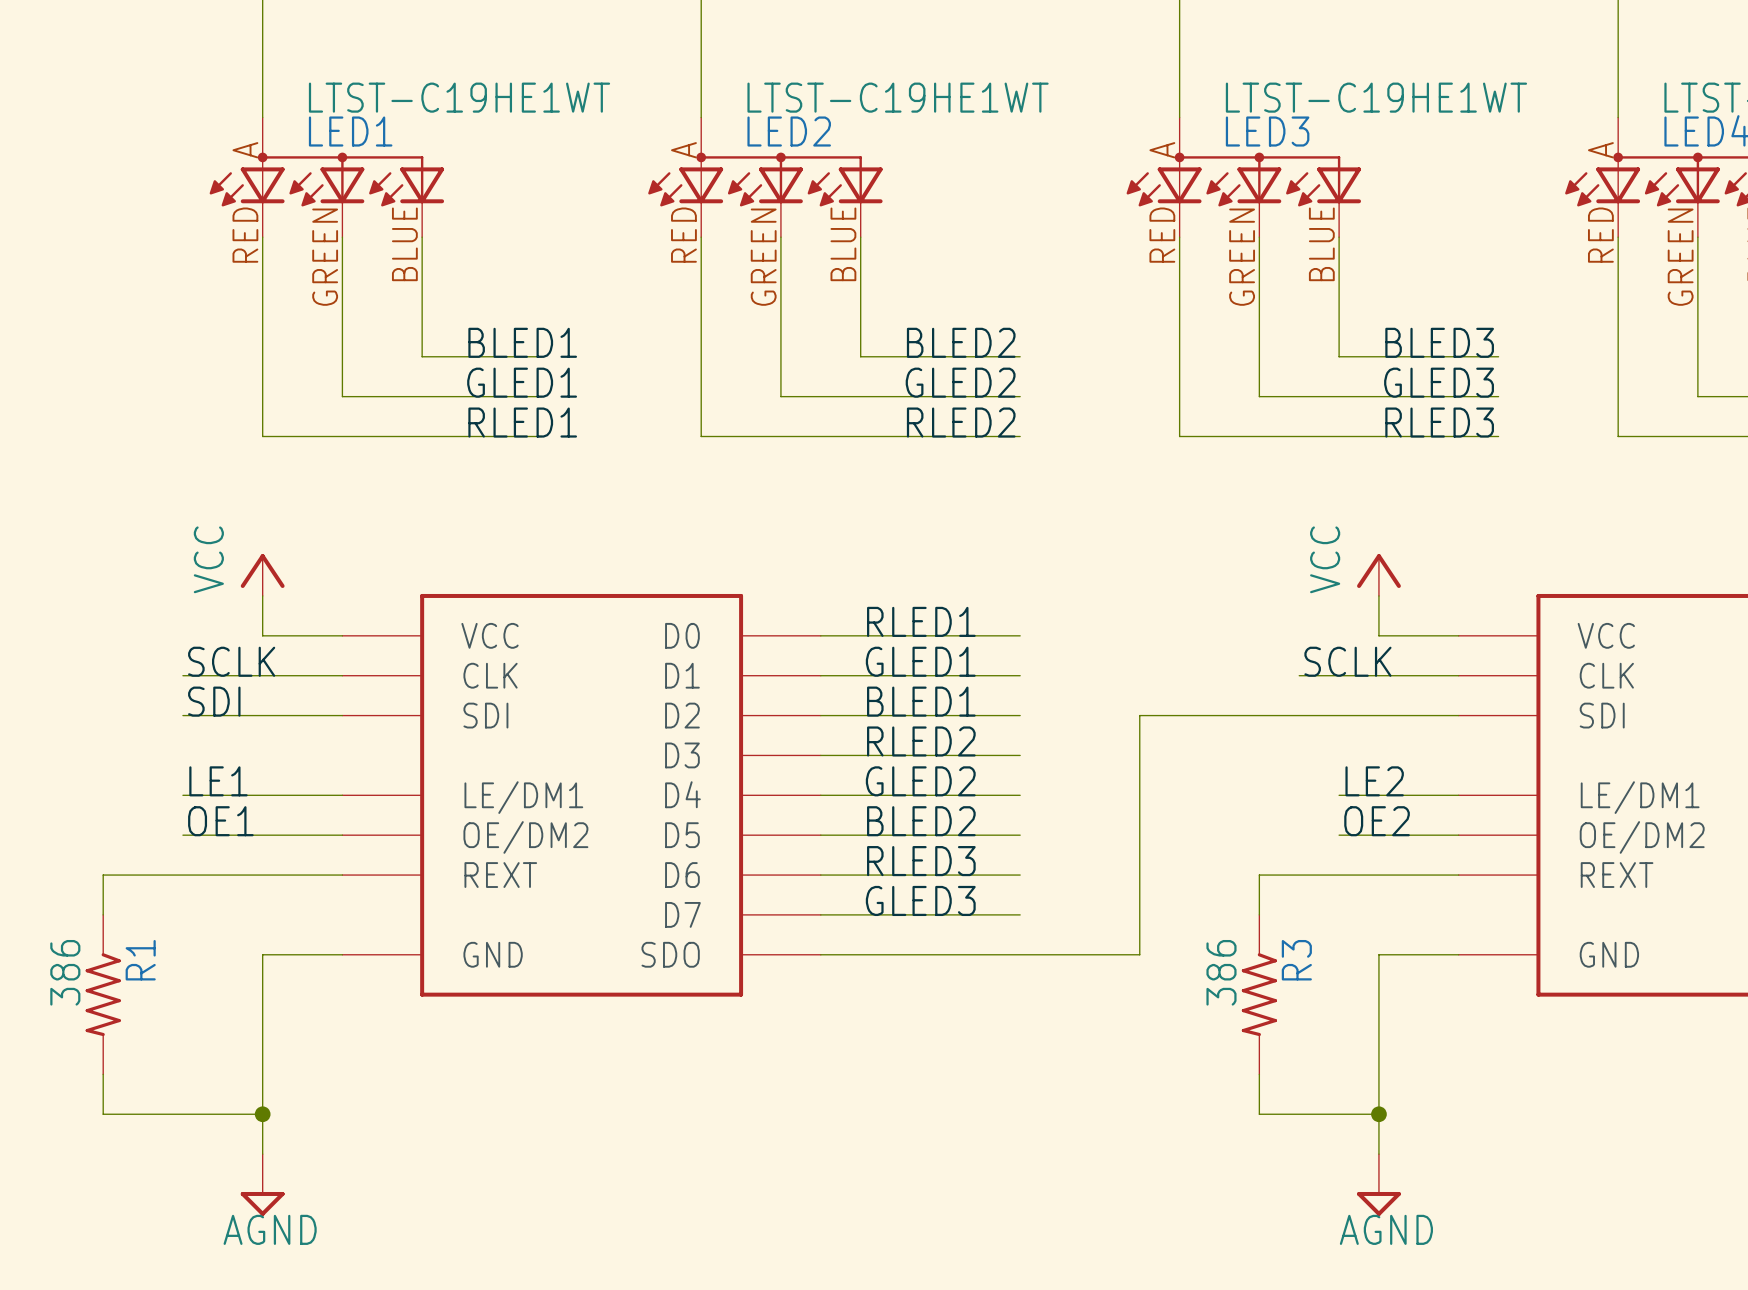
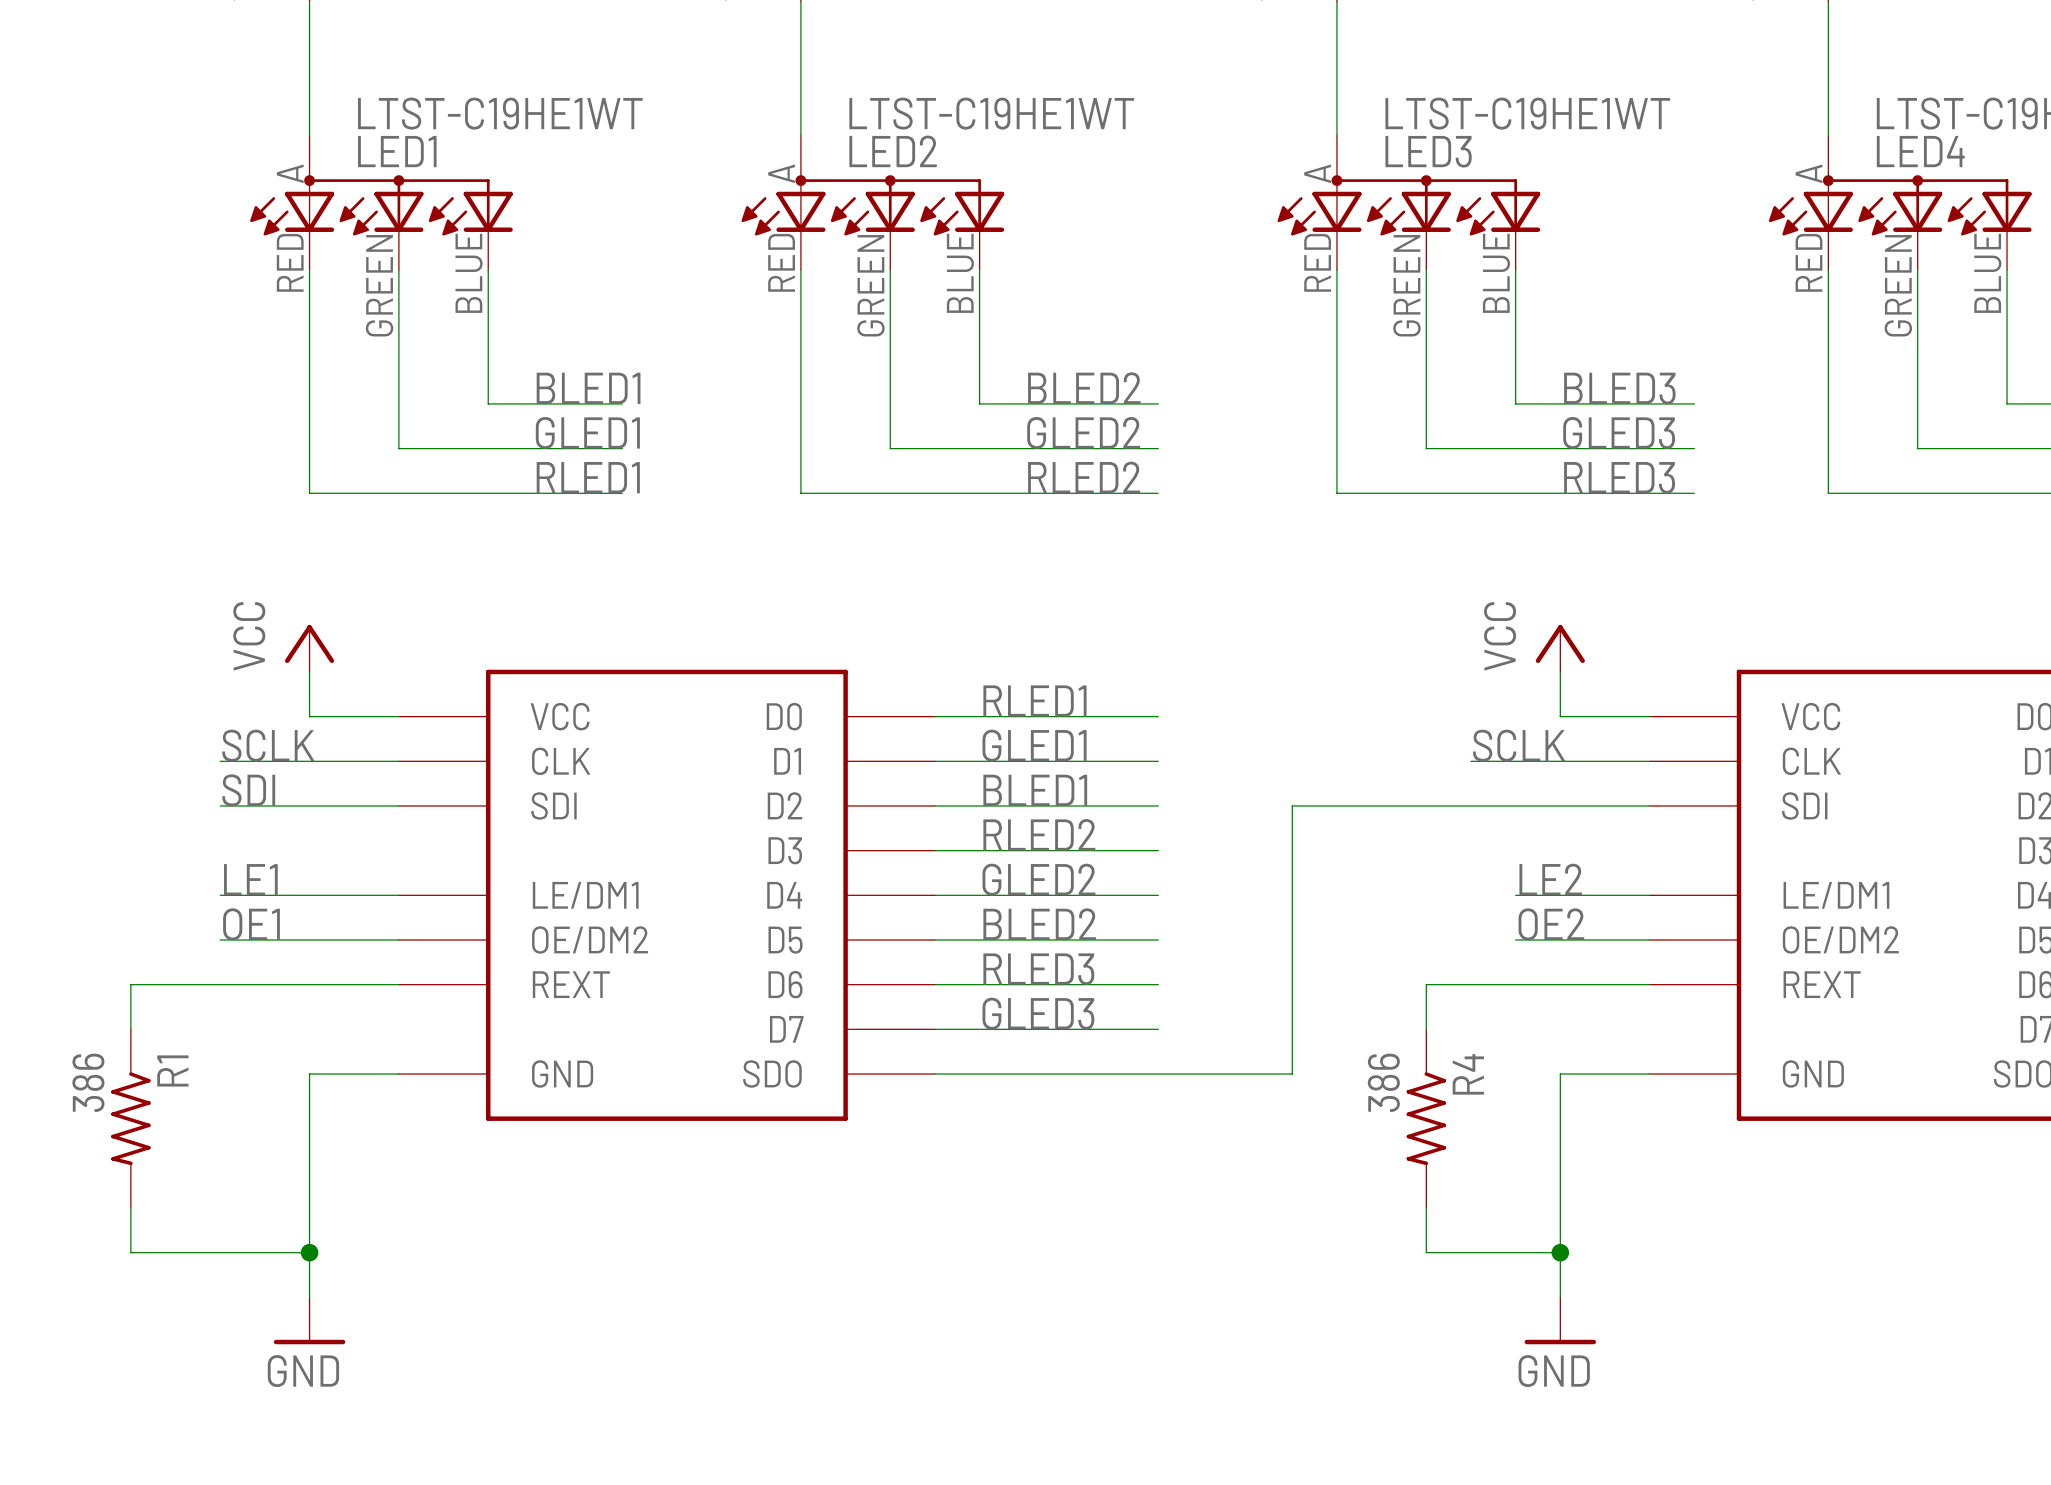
R3 name: R3 (1296, 960) -> R4 (1468, 1074)
power symbol: AGND (262, 1185) -> GND (309, 1320)
power symbol: AGND (1378, 1185) -> GND (1560, 1320)

